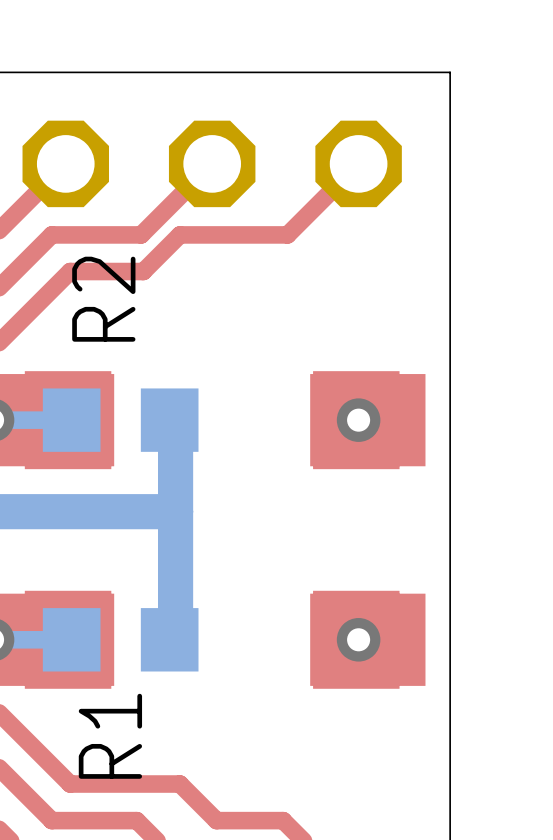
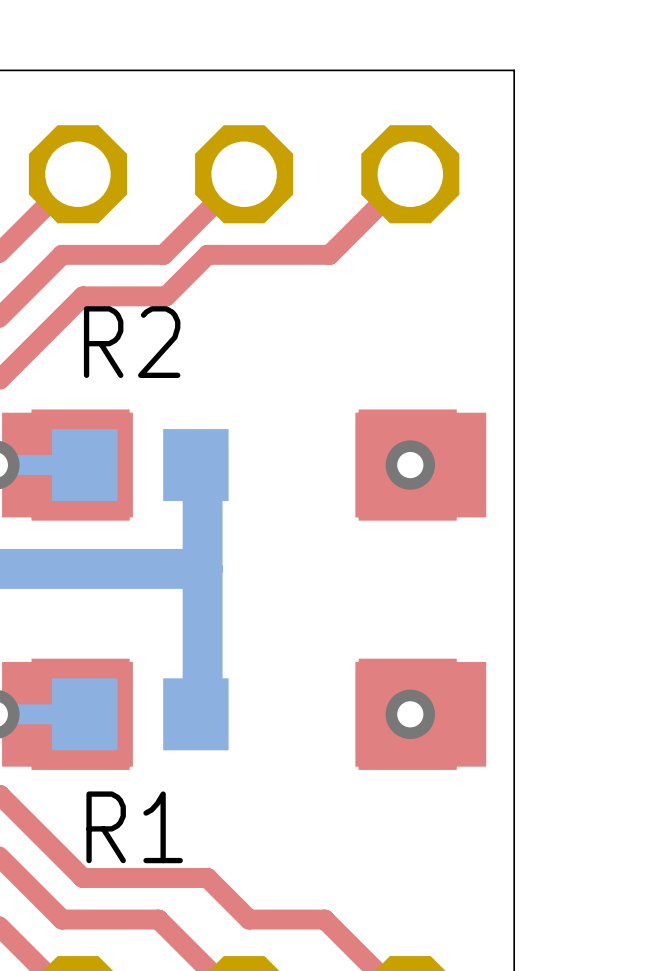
R2 name rotation: 0° (103, 299) -> 90° clockwise (132, 342)
R1 name rotation: 0° (110, 736) -> 90° clockwise (134, 827)

